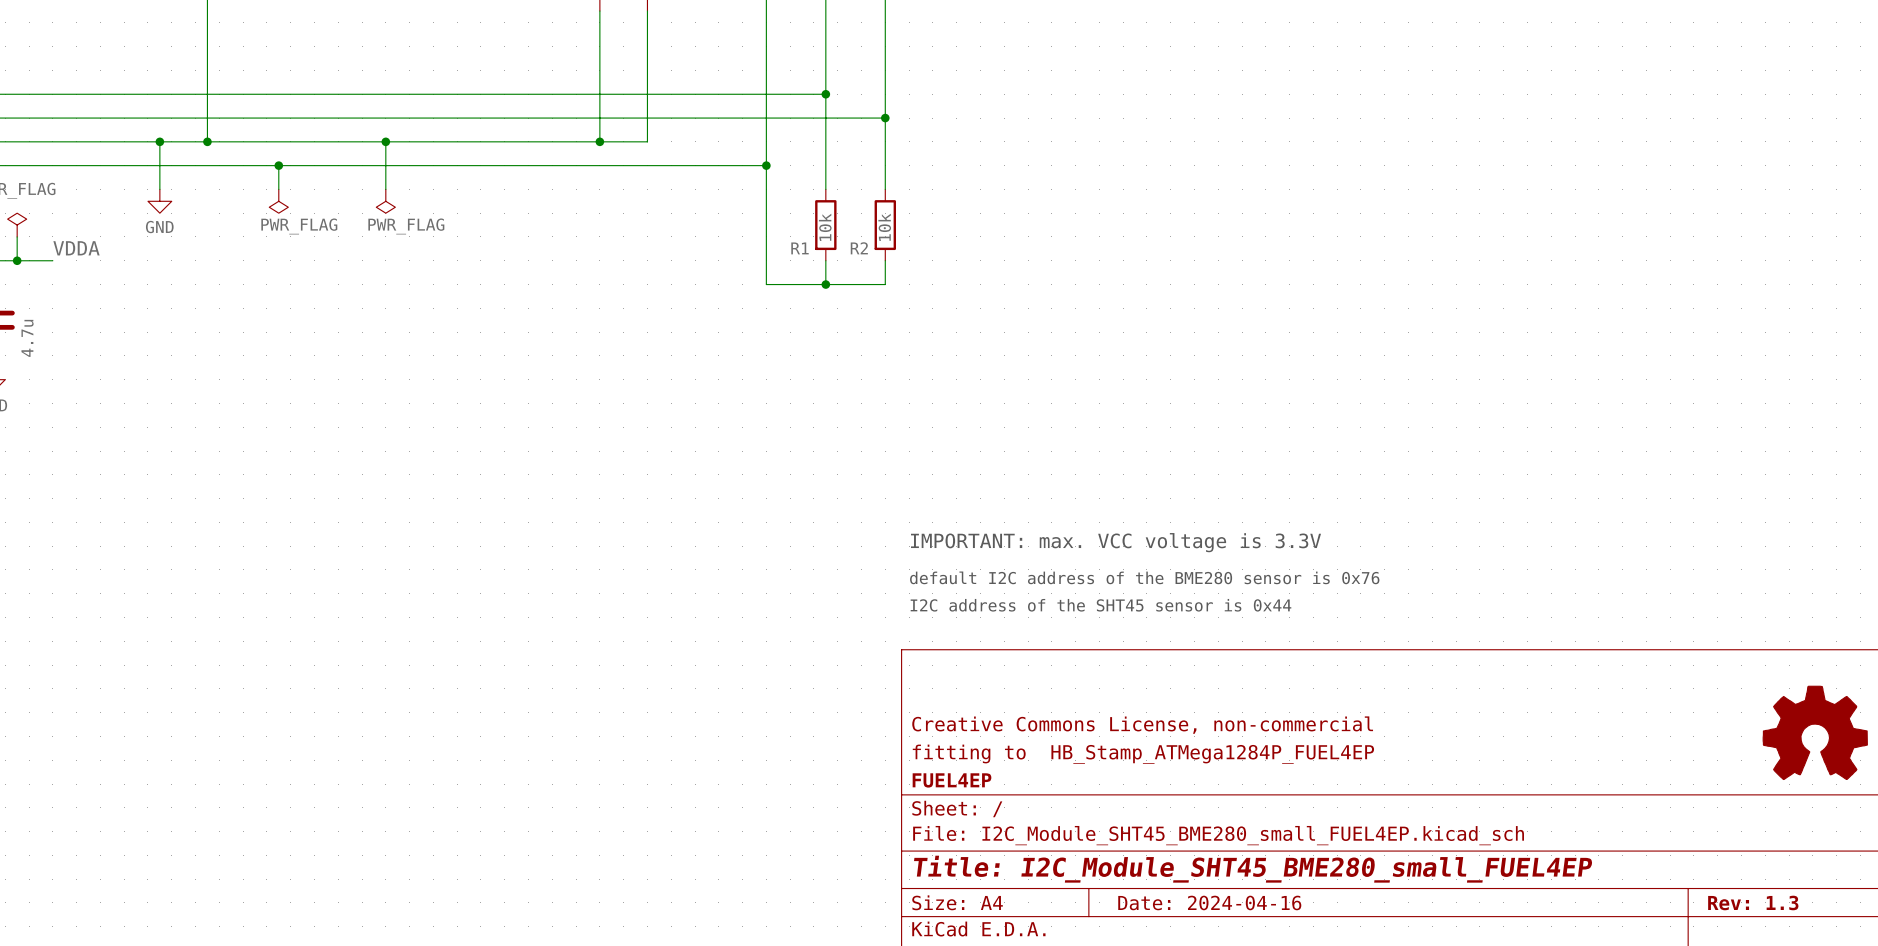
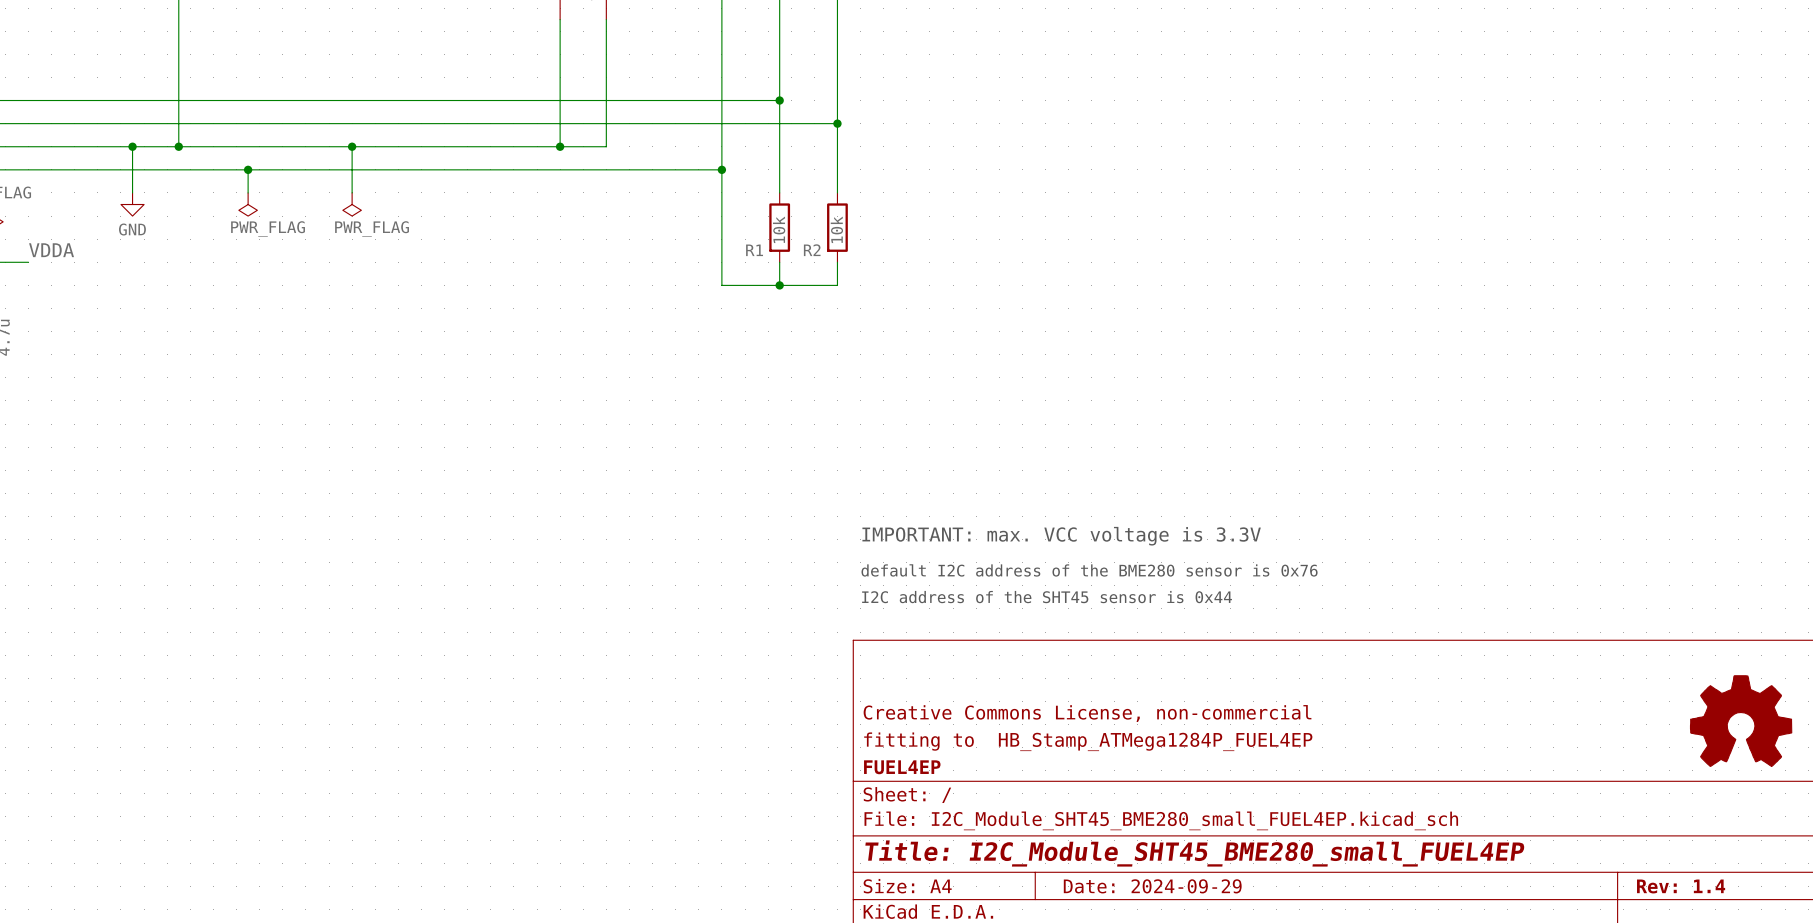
title block: Date: 2024-04-16 (1209, 902) -> Date: 2024-09-29 (1152, 886)
title block: Rev: 1.3 (1753, 902) -> Rev: 1.4 (1681, 886)

